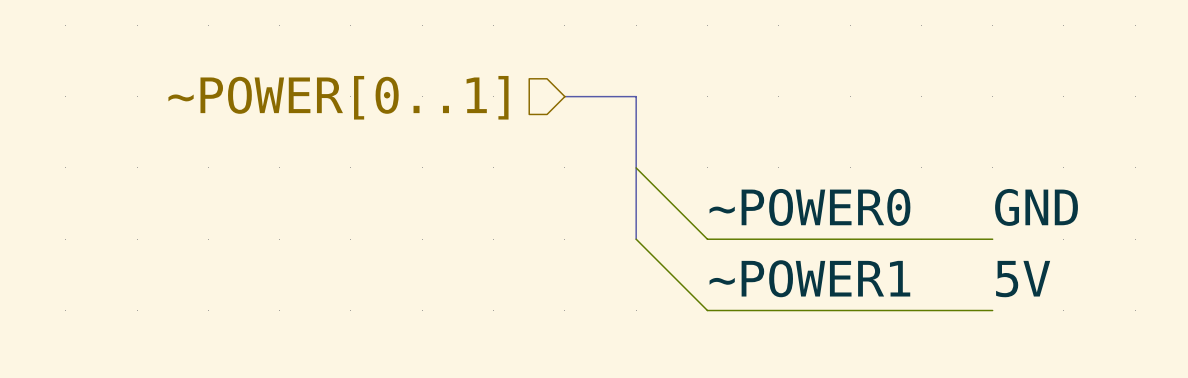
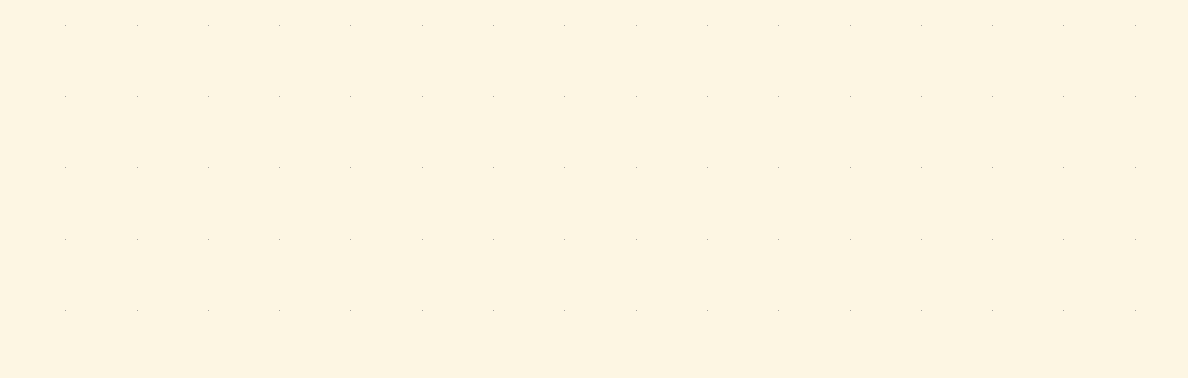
bus: (564, 96) (636, 96) (636, 239) -> none
hierarchical label: ~POWER[0..1] (338, 97) -> none
wire: (636, 167) (707, 239) (992, 239) -> none
label: ~POWER0 (809, 207) -> none
label: GND (1036, 207) -> none
wire: (636, 239) (707, 310) (992, 310) -> none
label: ~POWER1 (809, 278) -> none
label: 5V (1023, 279) -> none

